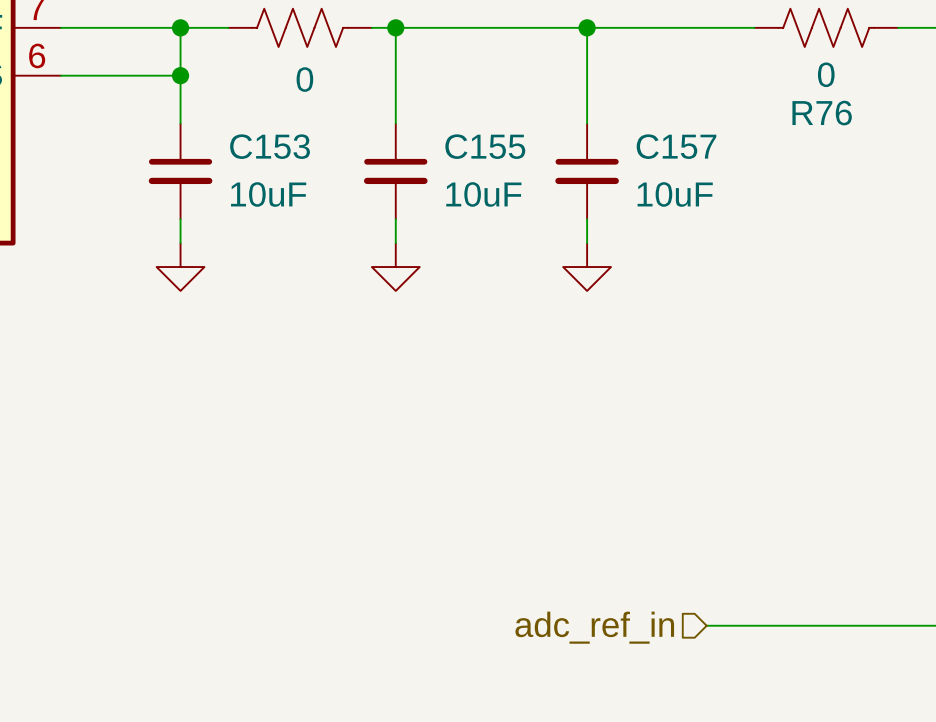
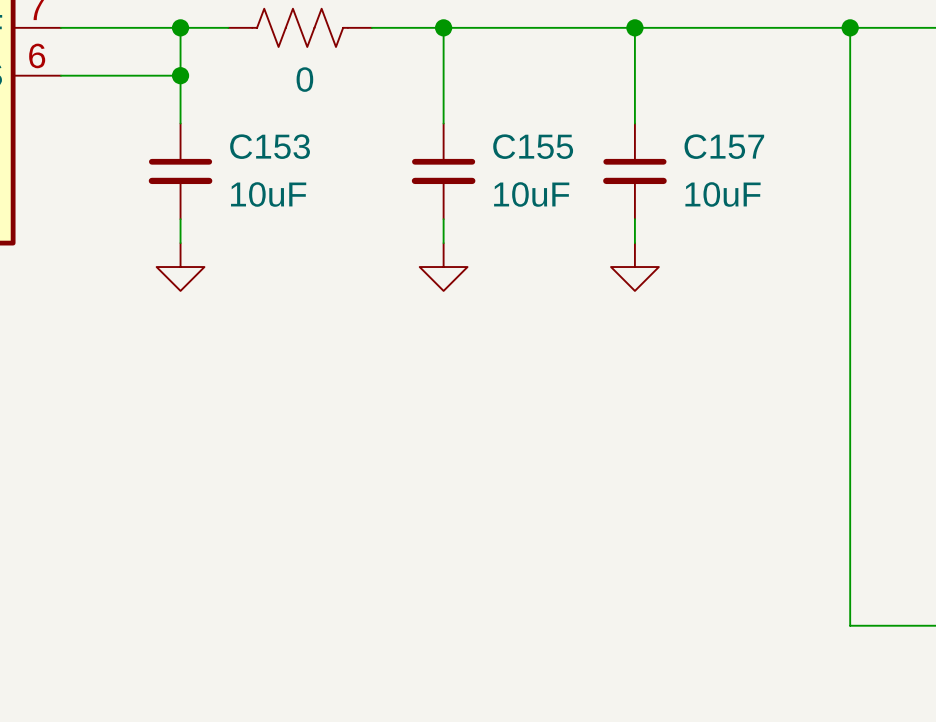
wire: (395, 27) (395, 123) -> (443, 27) (443, 123)
junction position: (395, 27) -> (443, 27)
wire: (587, 27) (587, 123) -> (634, 27) (634, 123)
junction position: (587, 27) -> (634, 27)
wire: none -> (754, 27) (898, 27)
R76: 0 (826, 27) -> none
junction: none -> (850, 27)
C155 position: (395, 171) -> (443, 171)
C157 position: (587, 171) -> (634, 171)
wire: (395, 219) (395, 243) -> (443, 219) (443, 243)
wire: (587, 219) (587, 243) -> (634, 219) (634, 243)
power symbol position: (395, 267) -> (443, 267)
power symbol position: (587, 267) -> (634, 267)
wire: (706, 625) (850, 625) -> (850, 27) (850, 625)
hierarchical label: adc_ref_in (594, 627) -> none

